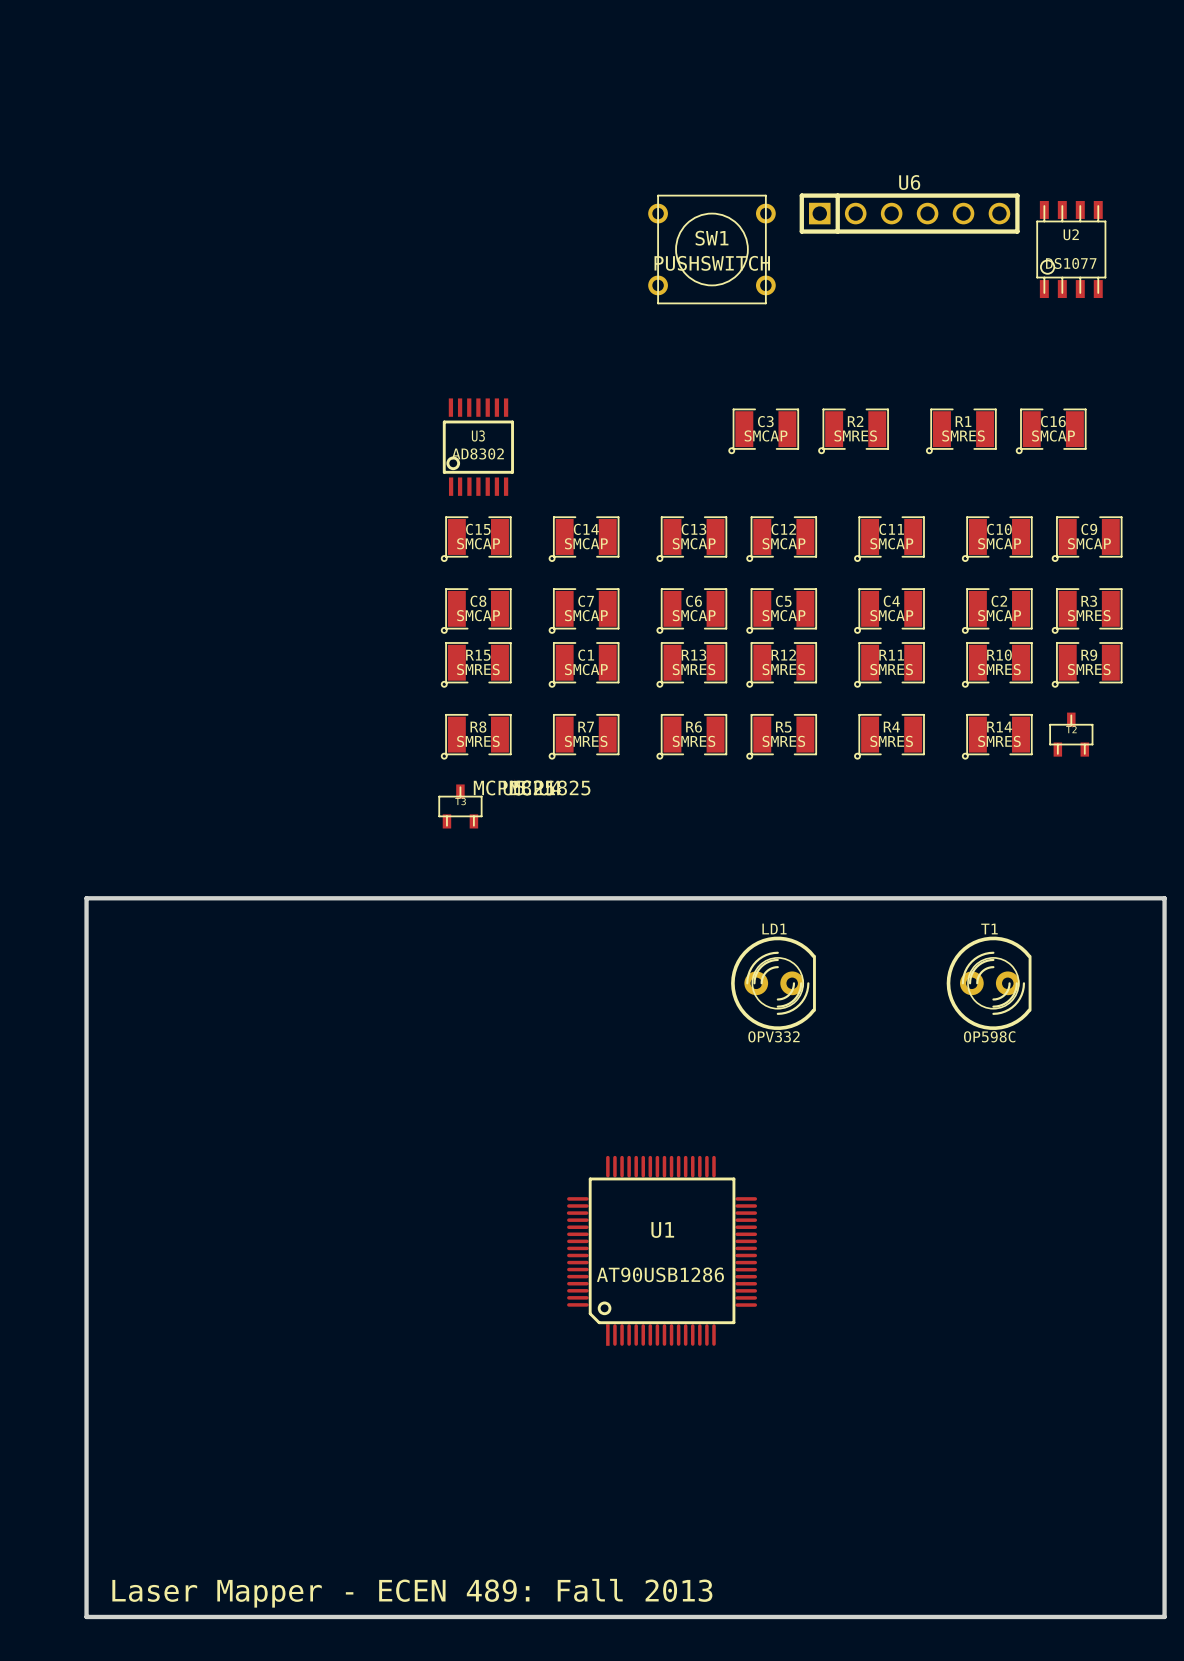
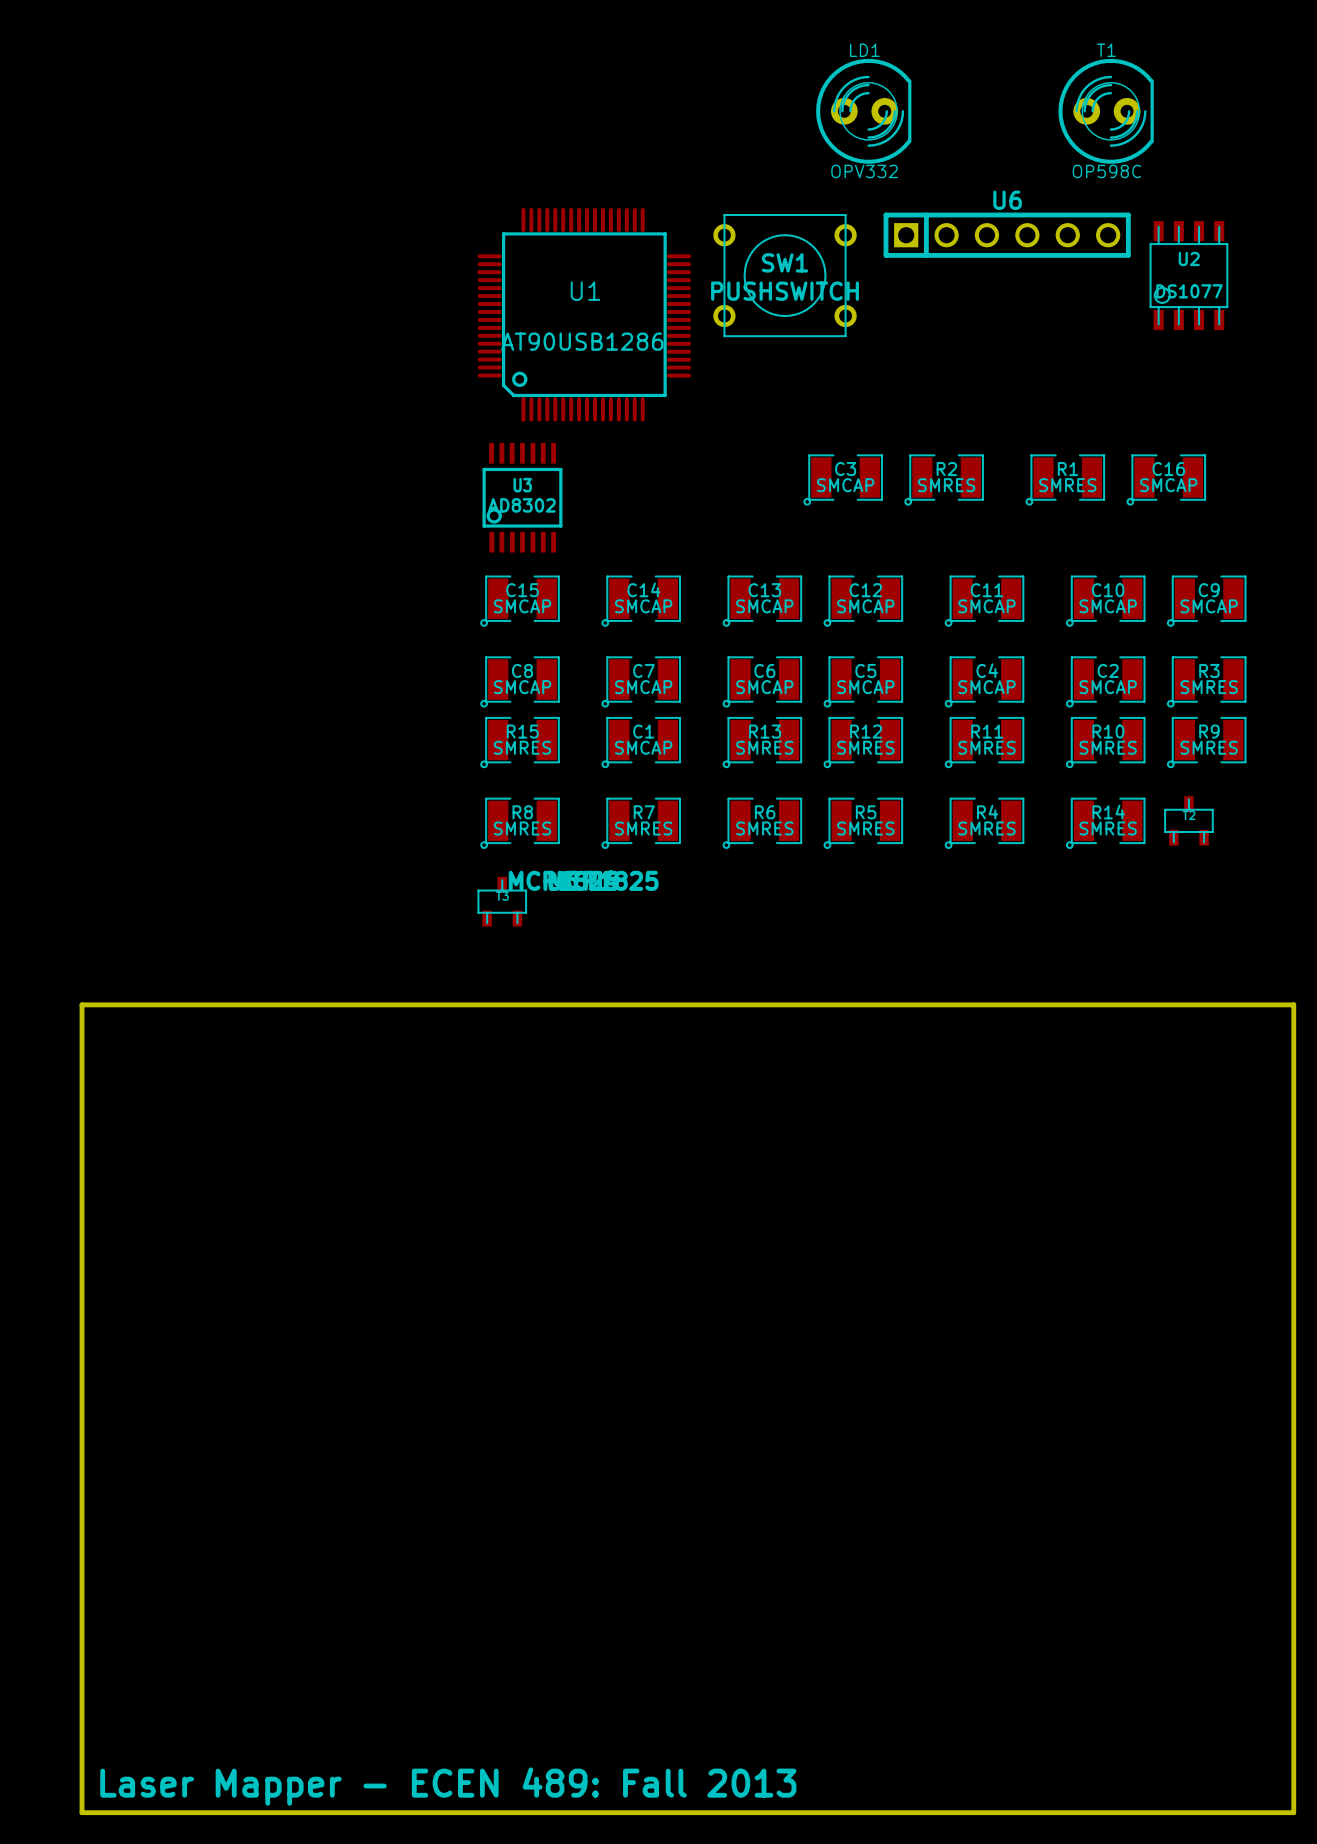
LD1 position: (773, 983) -> (863, 111)
T1 position: (989, 983) -> (1106, 111)
U1 position: (661, 1250) -> (584, 314)

